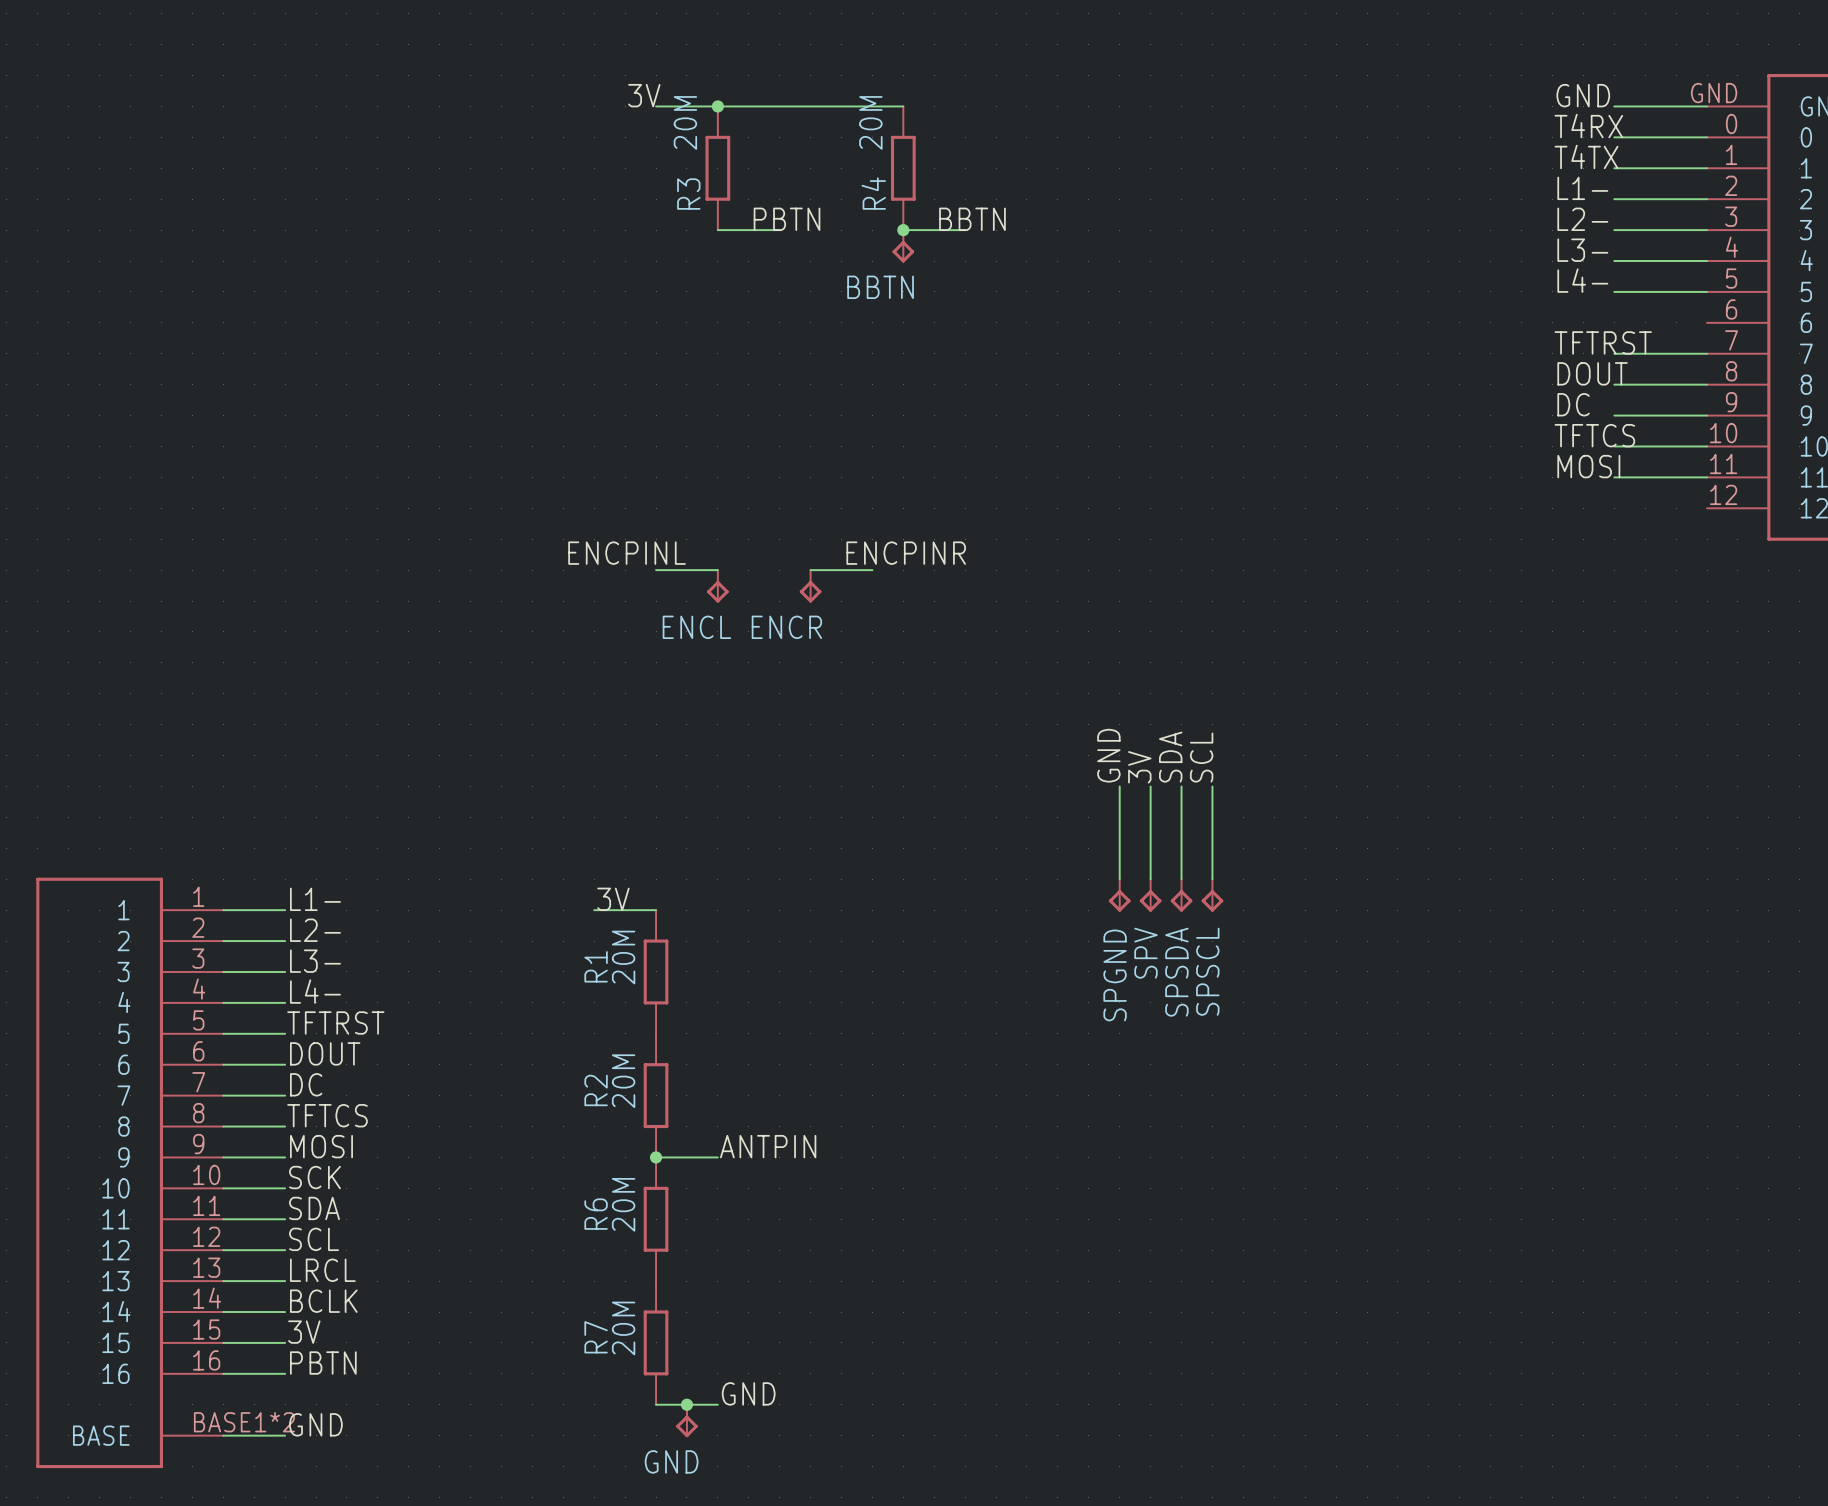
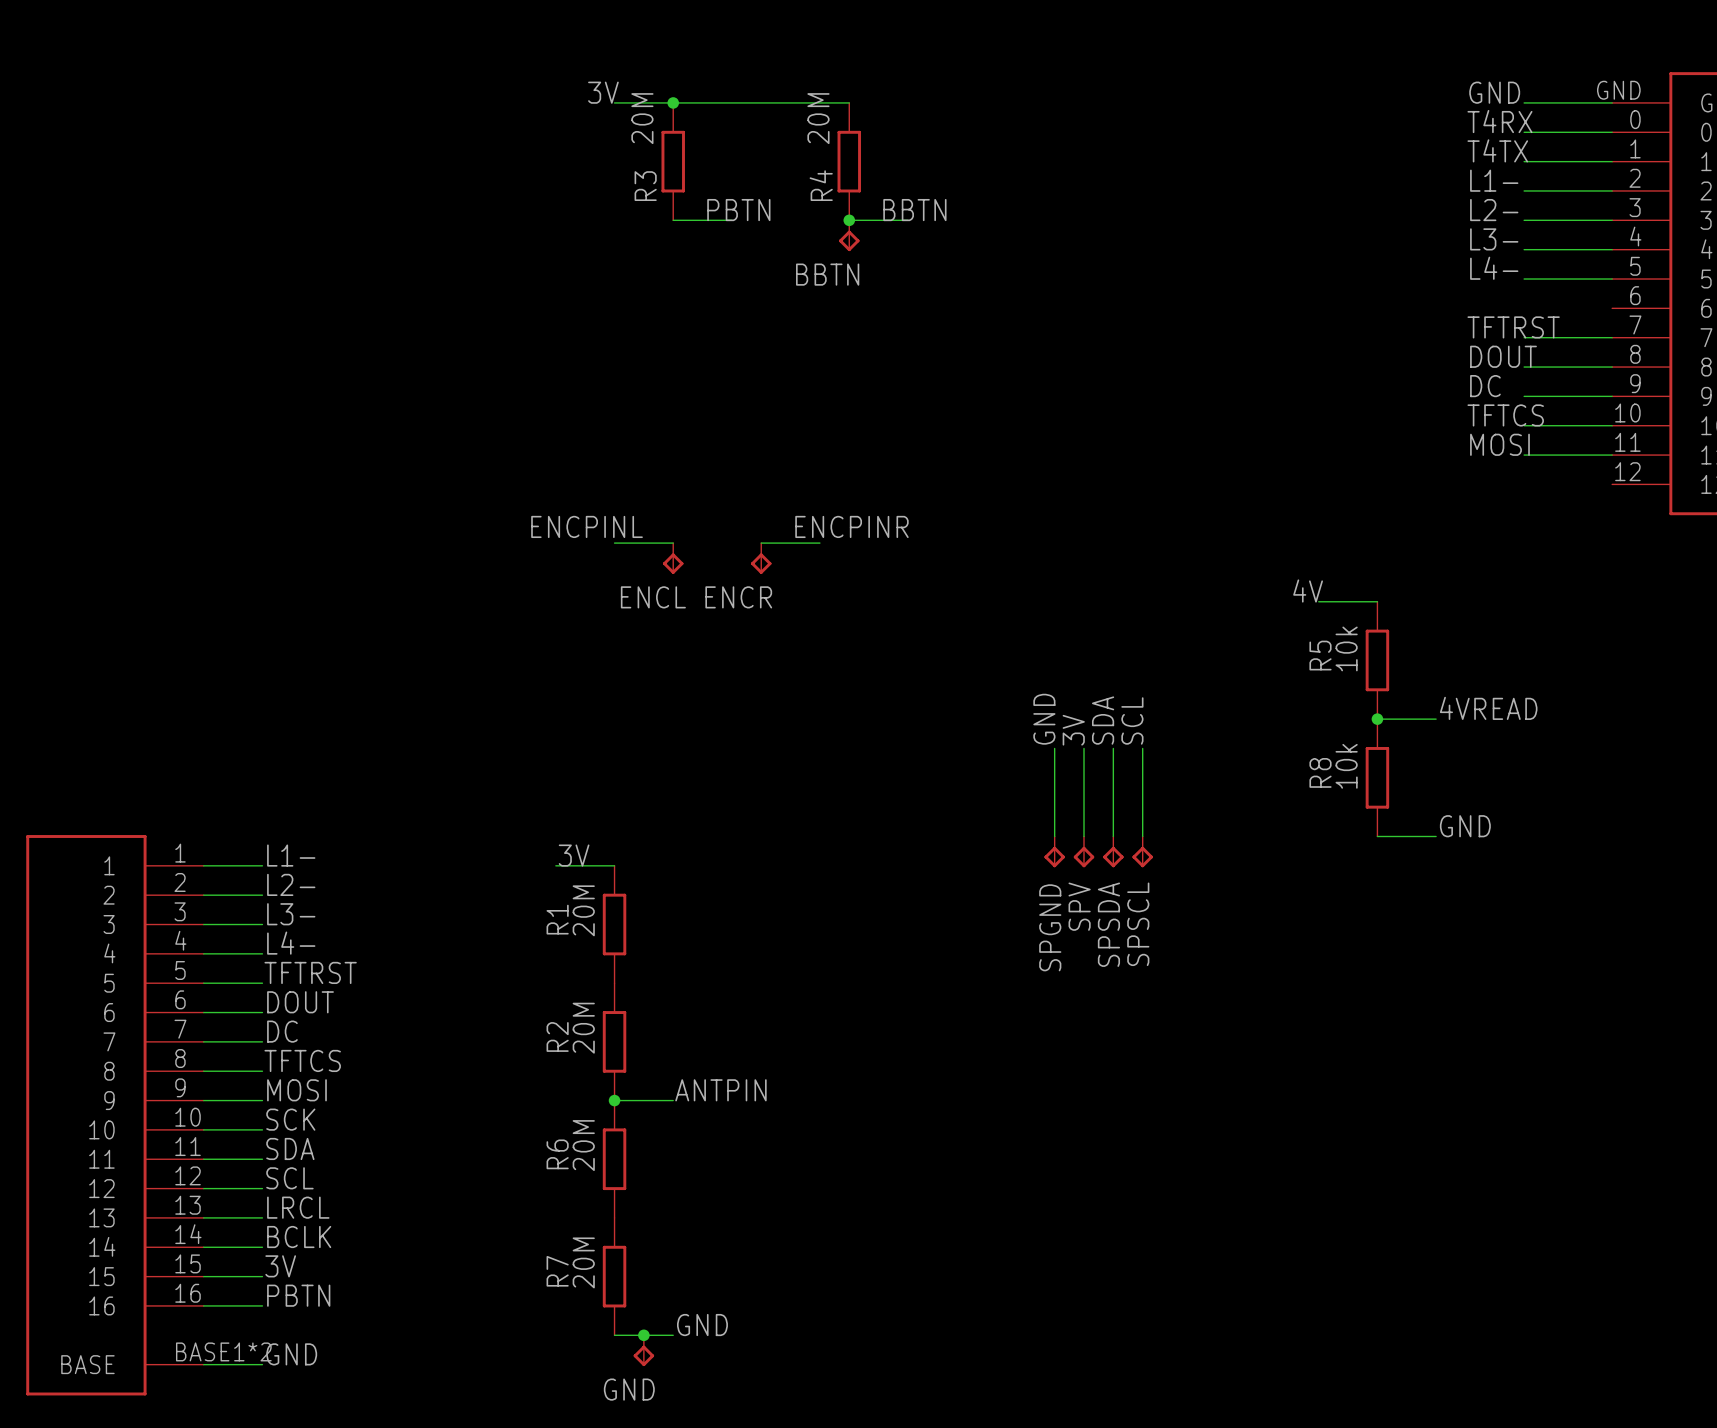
label: none -> 4V (1308, 591)
wire: none -> (1318, 601) (1377, 601)
R5: none -> 10k (1377, 660)
label: none -> 4VREAD (1488, 708)
wire: none -> (1377, 719) (1436, 719)
junction: none -> (1377, 719)
R8: none -> 10k (1377, 777)
label: none -> GND (1465, 826)
wire: none -> (1377, 836) (1436, 836)

